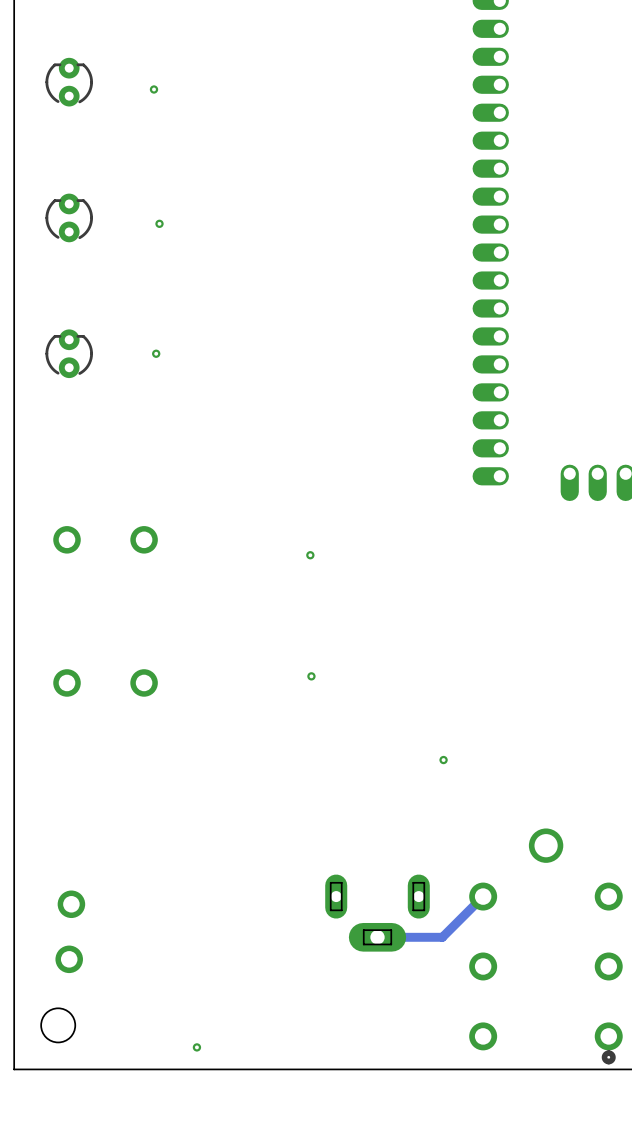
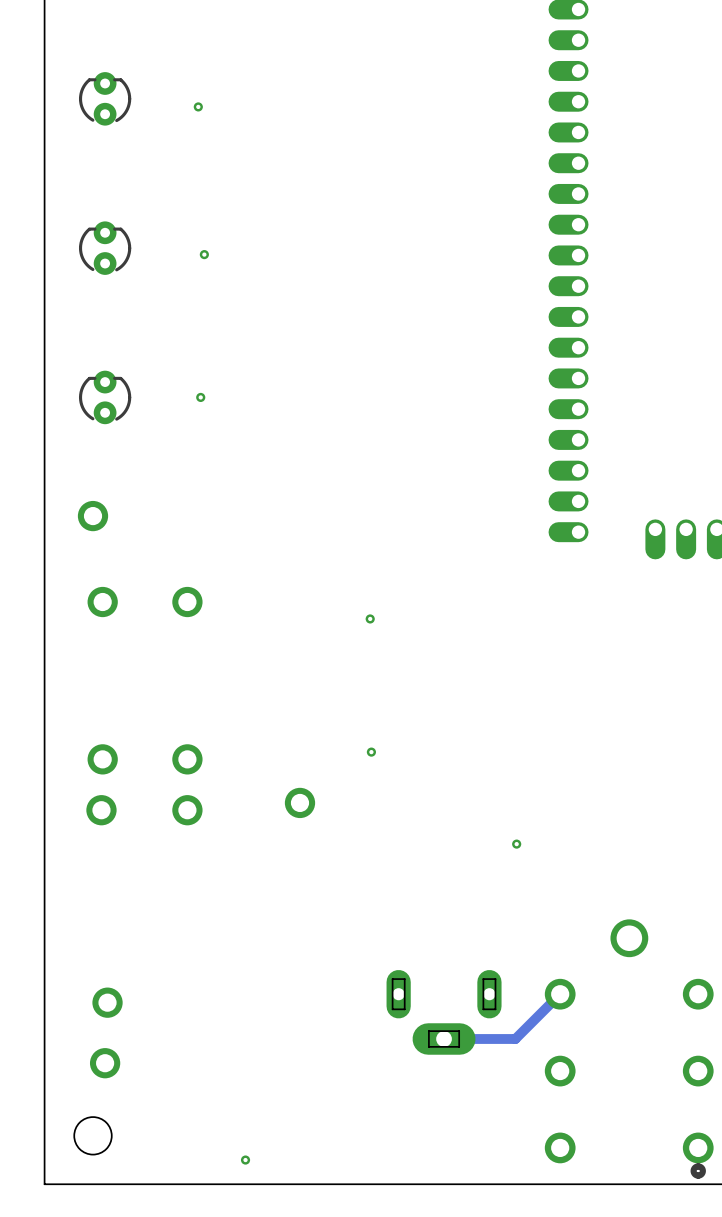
via: none -> (93, 516)
via: none -> (299, 802)
via: none -> (101, 810)
via: none -> (187, 810)

